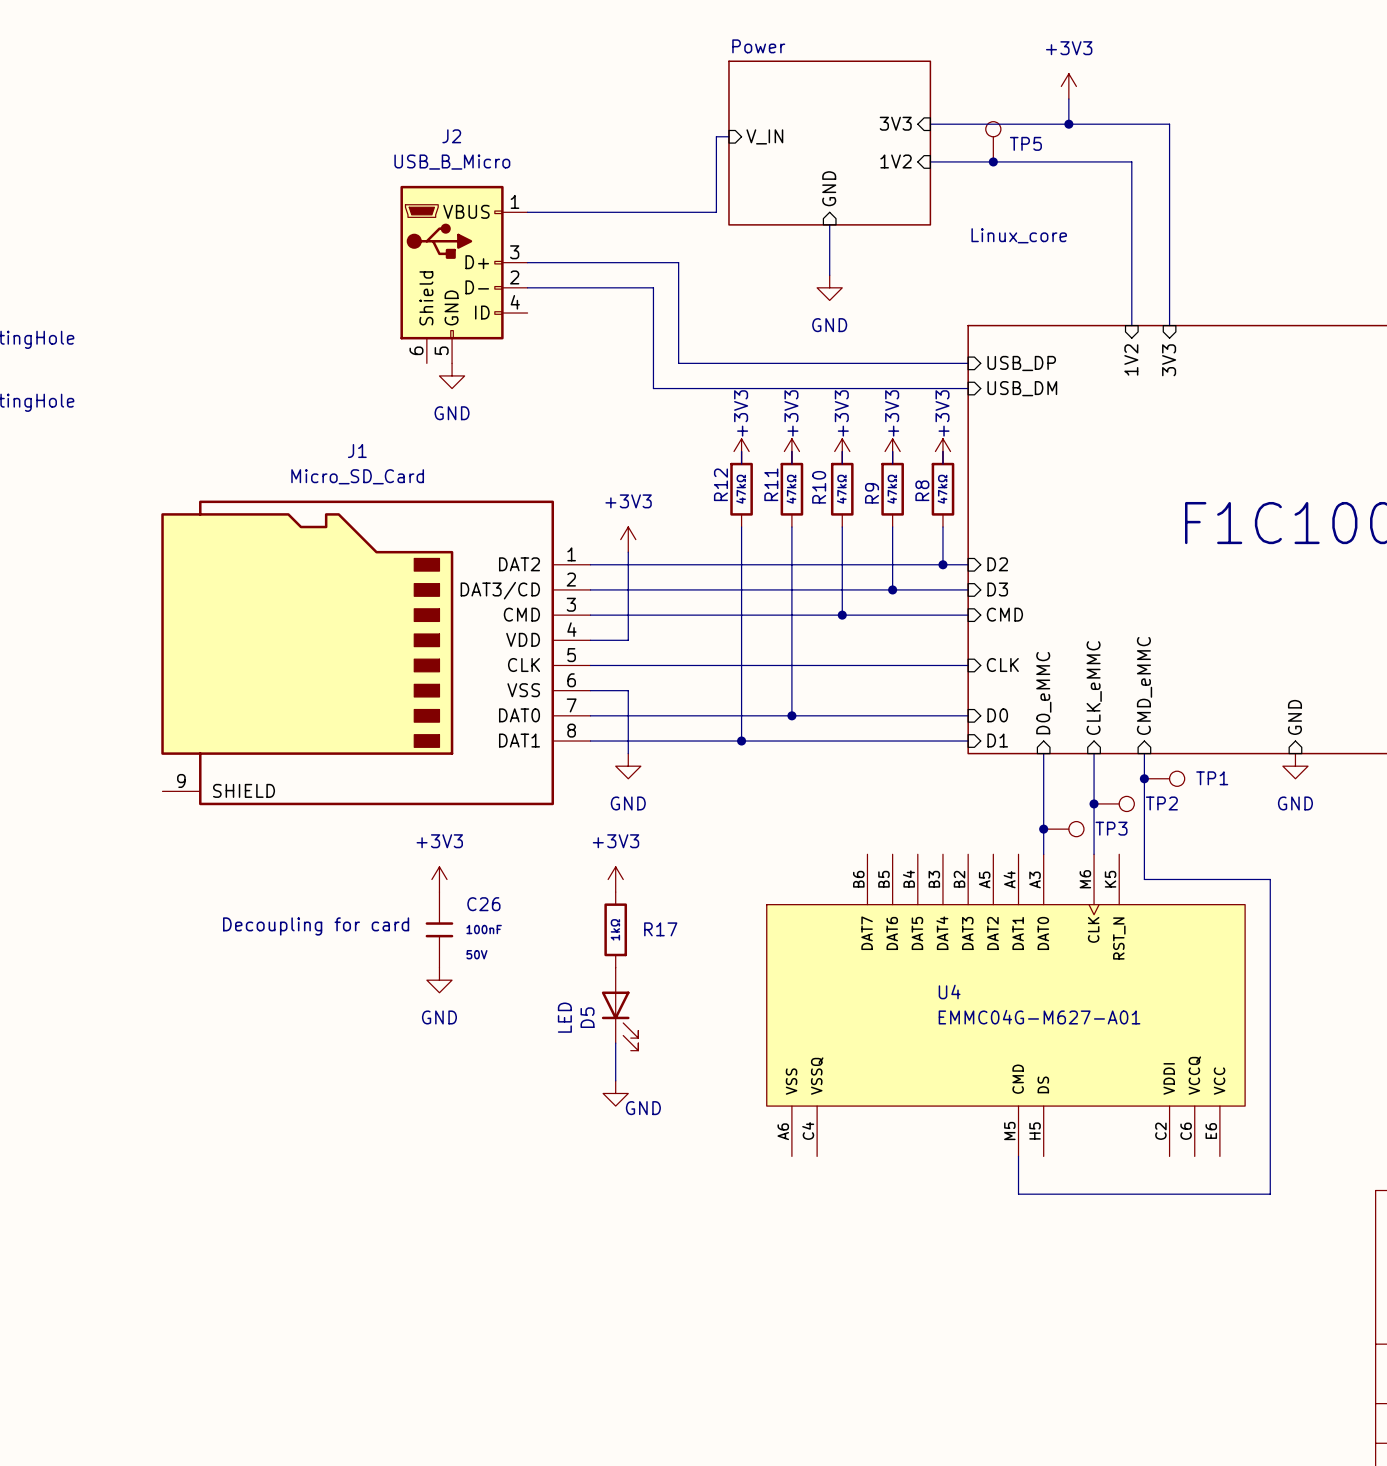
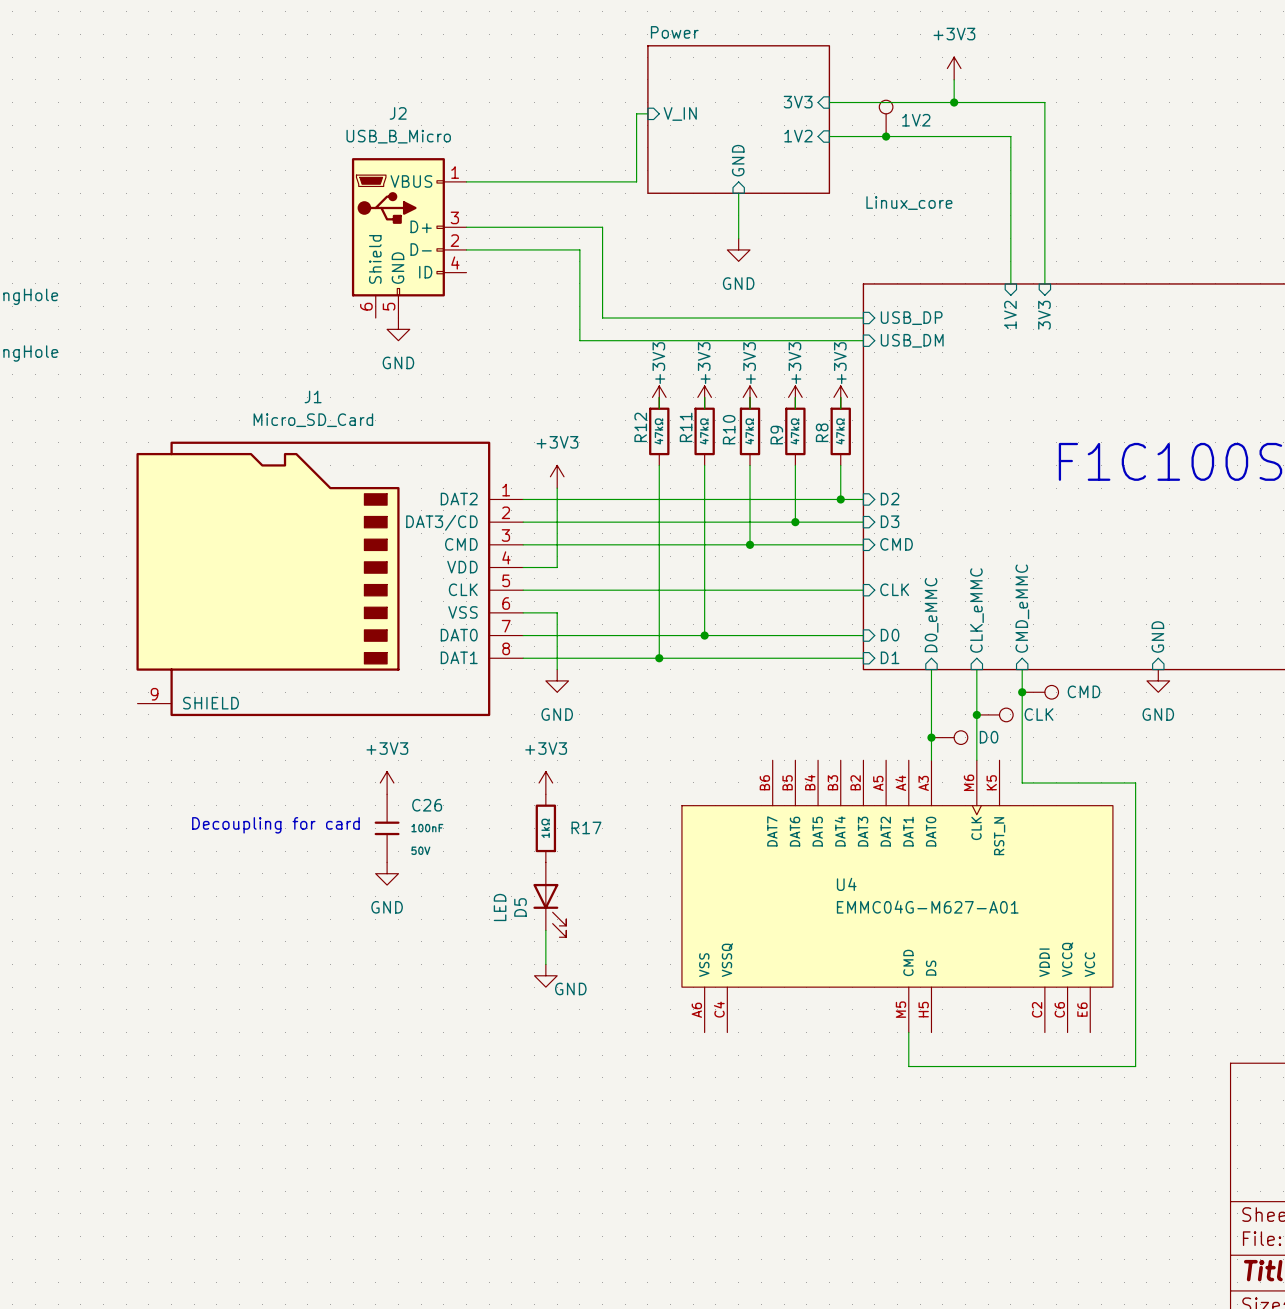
TP5 name: TP5 (1025, 143) -> 1V2 (916, 120)
TP1 name: TP1 (1212, 778) -> CMD (1084, 691)
TP2 name: TP2 (1161, 803) -> CLK (1039, 714)
TP3 name: TP3 (1111, 828) -> D0 (989, 737)

